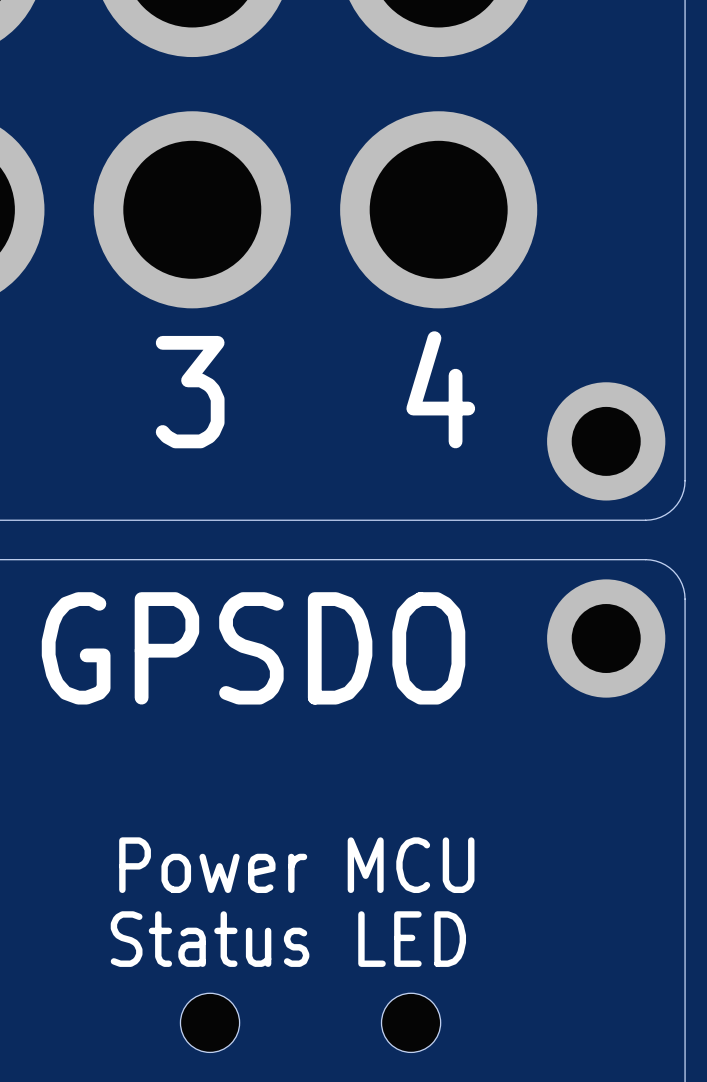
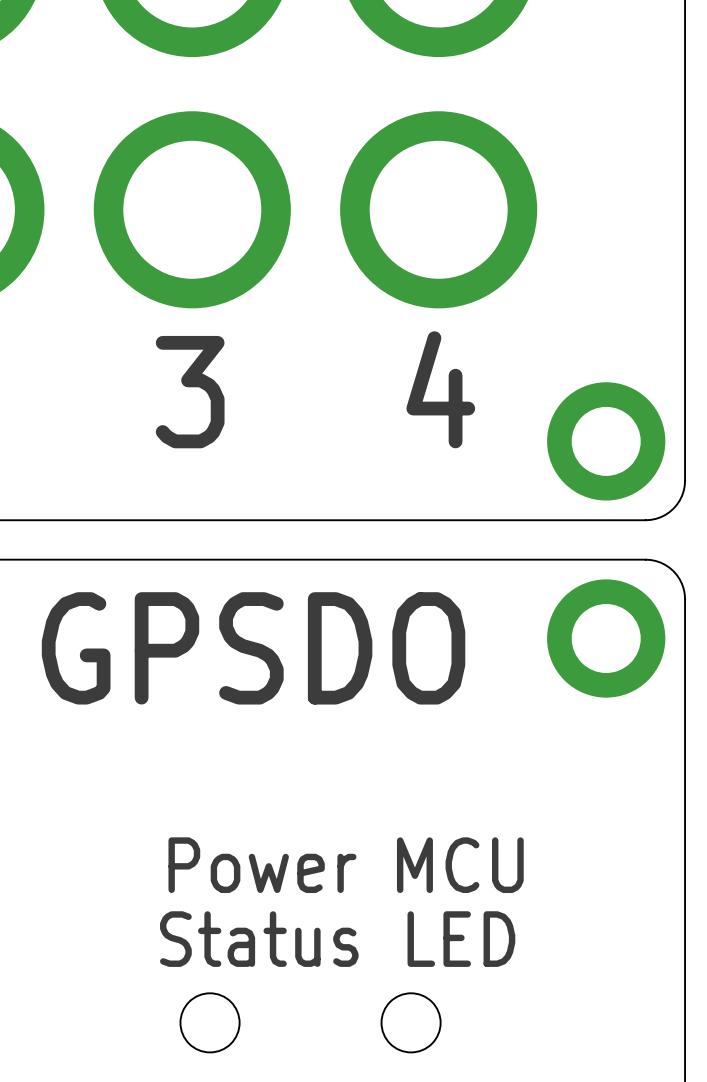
text position: Power (213, 865) -> Power (262, 865)
text position: MCU (411, 865) -> MCU (460, 865)
text position: Status (210, 939) -> Status (259, 939)
text position: LED (412, 939) -> LED (461, 939)

